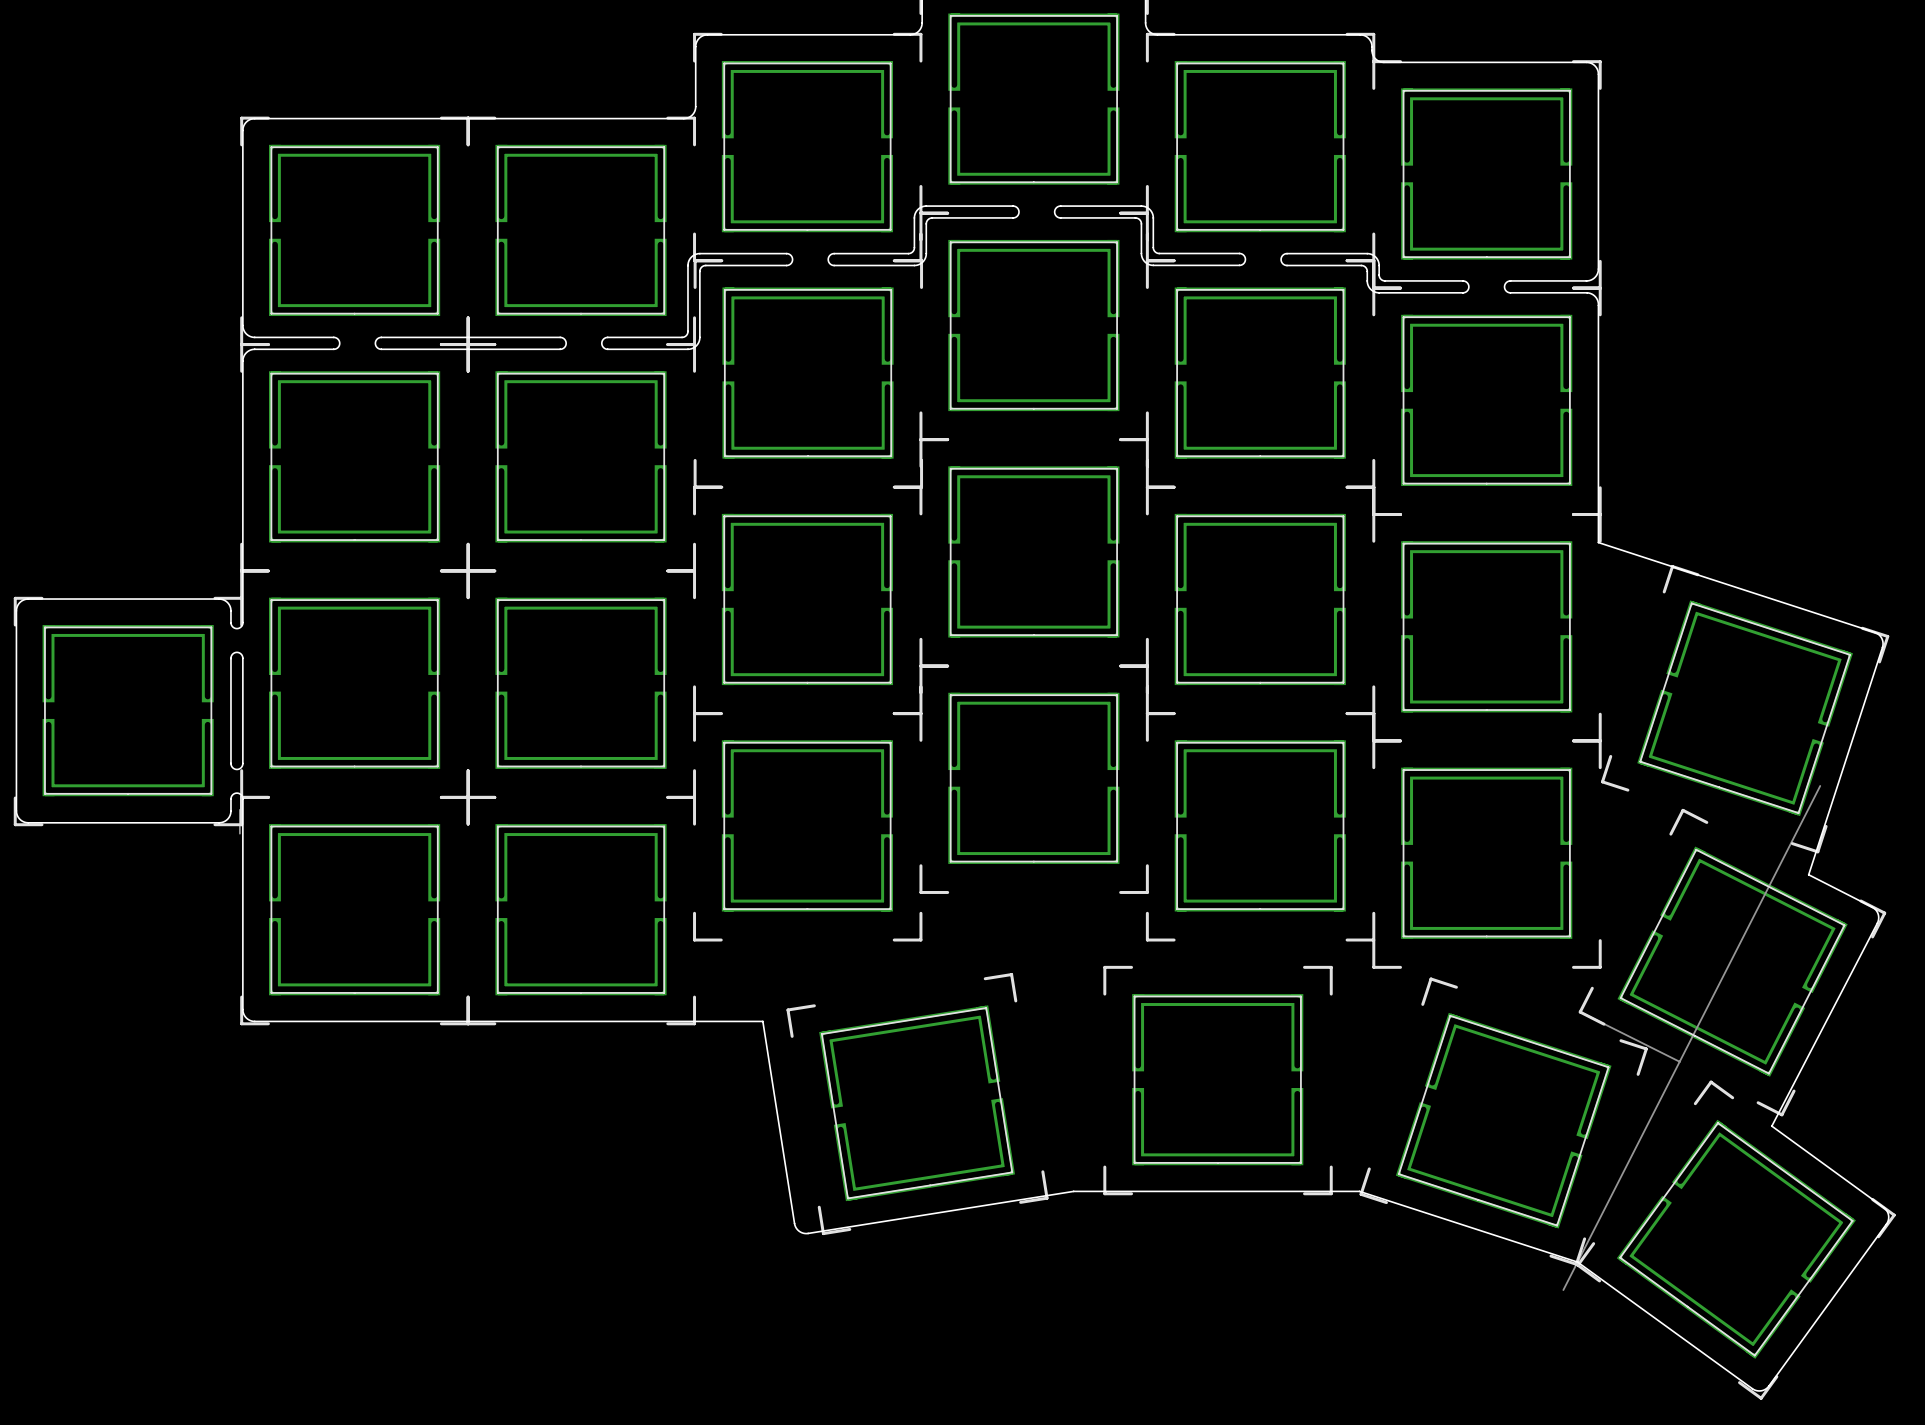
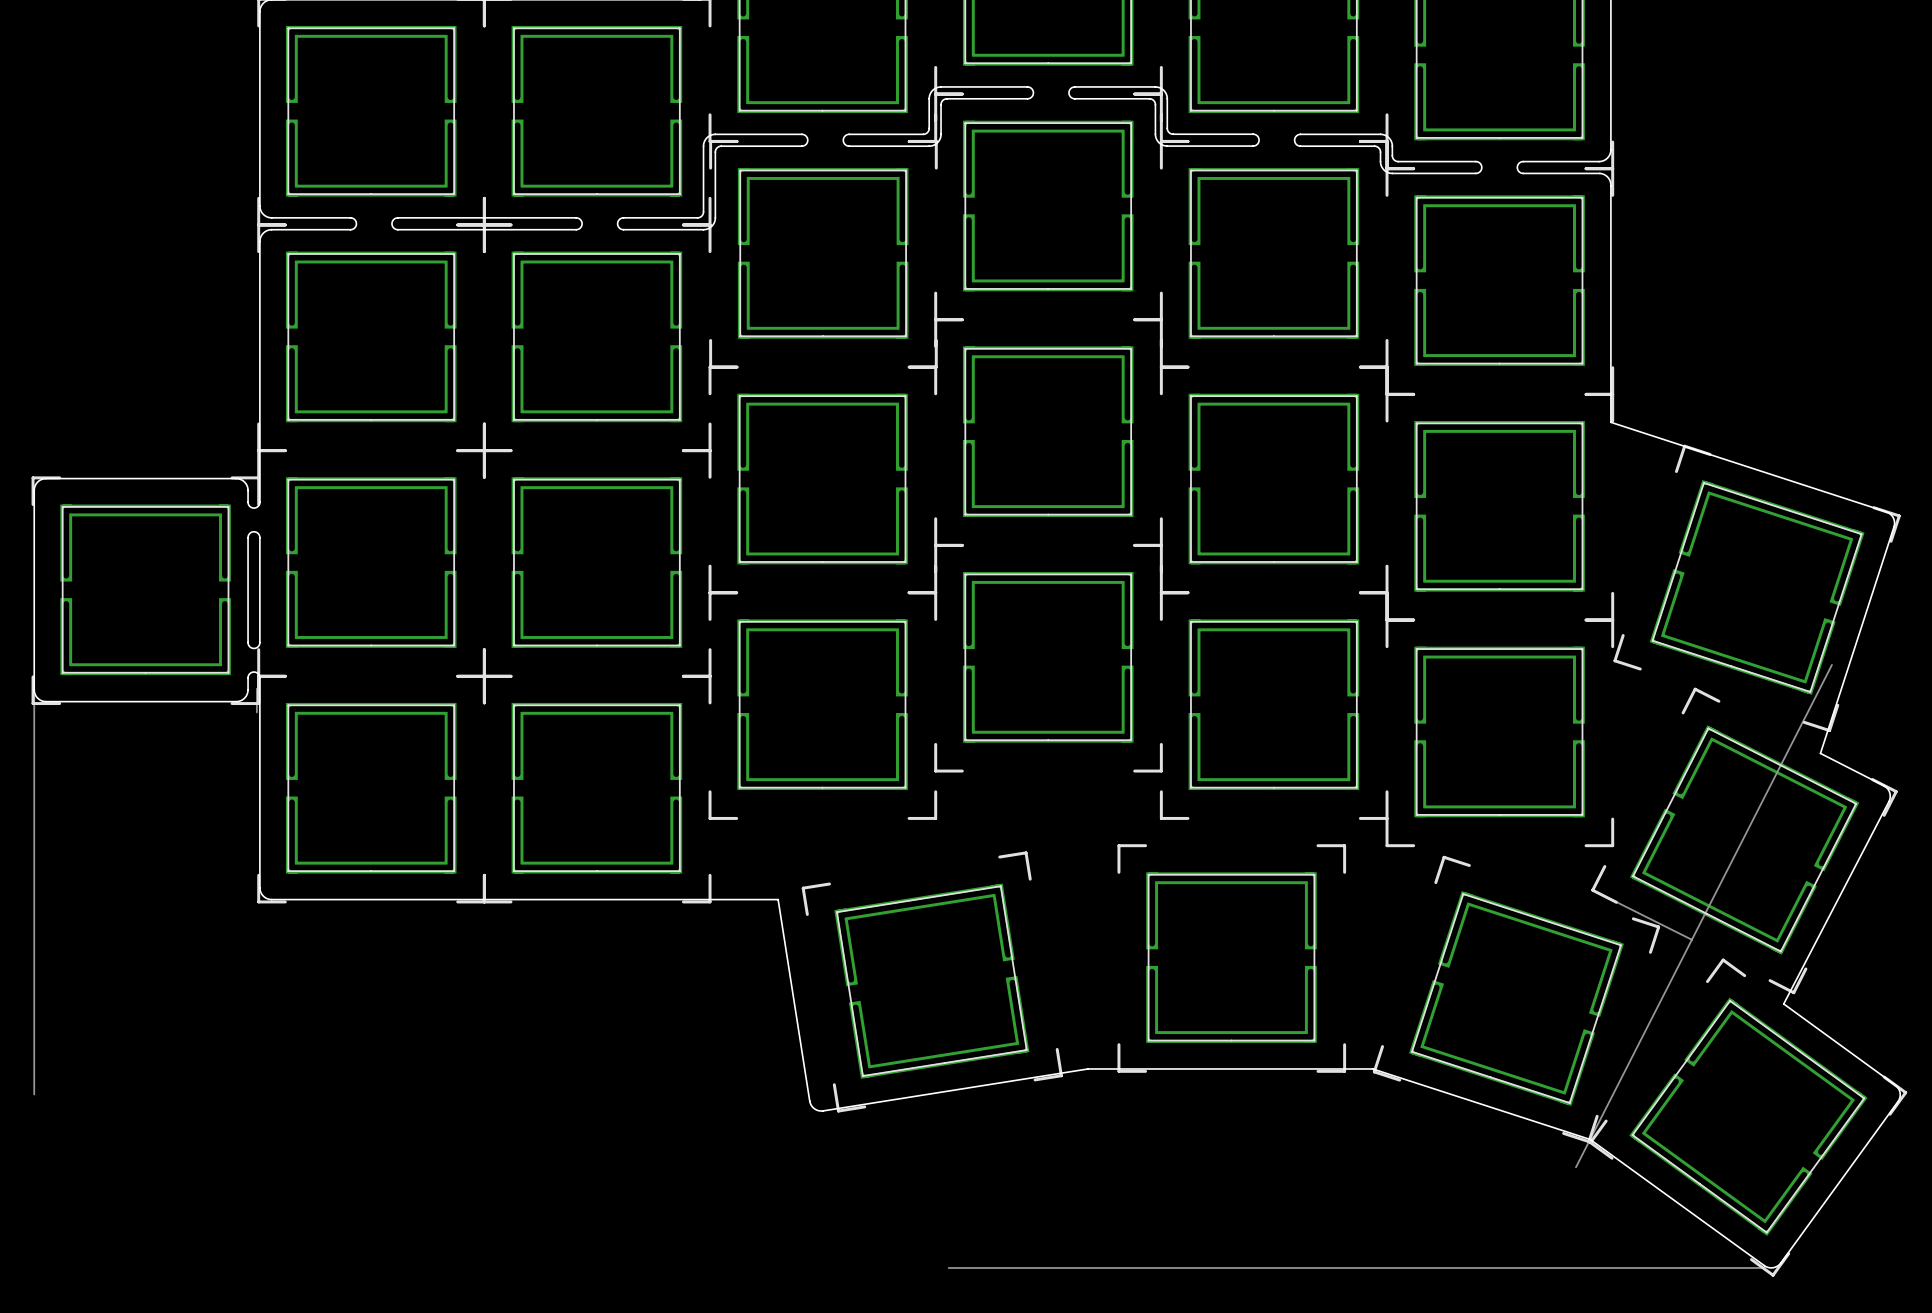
line: none -> (34, 695) (34, 1094)
line: none -> (948, 1267) (1764, 1267)

